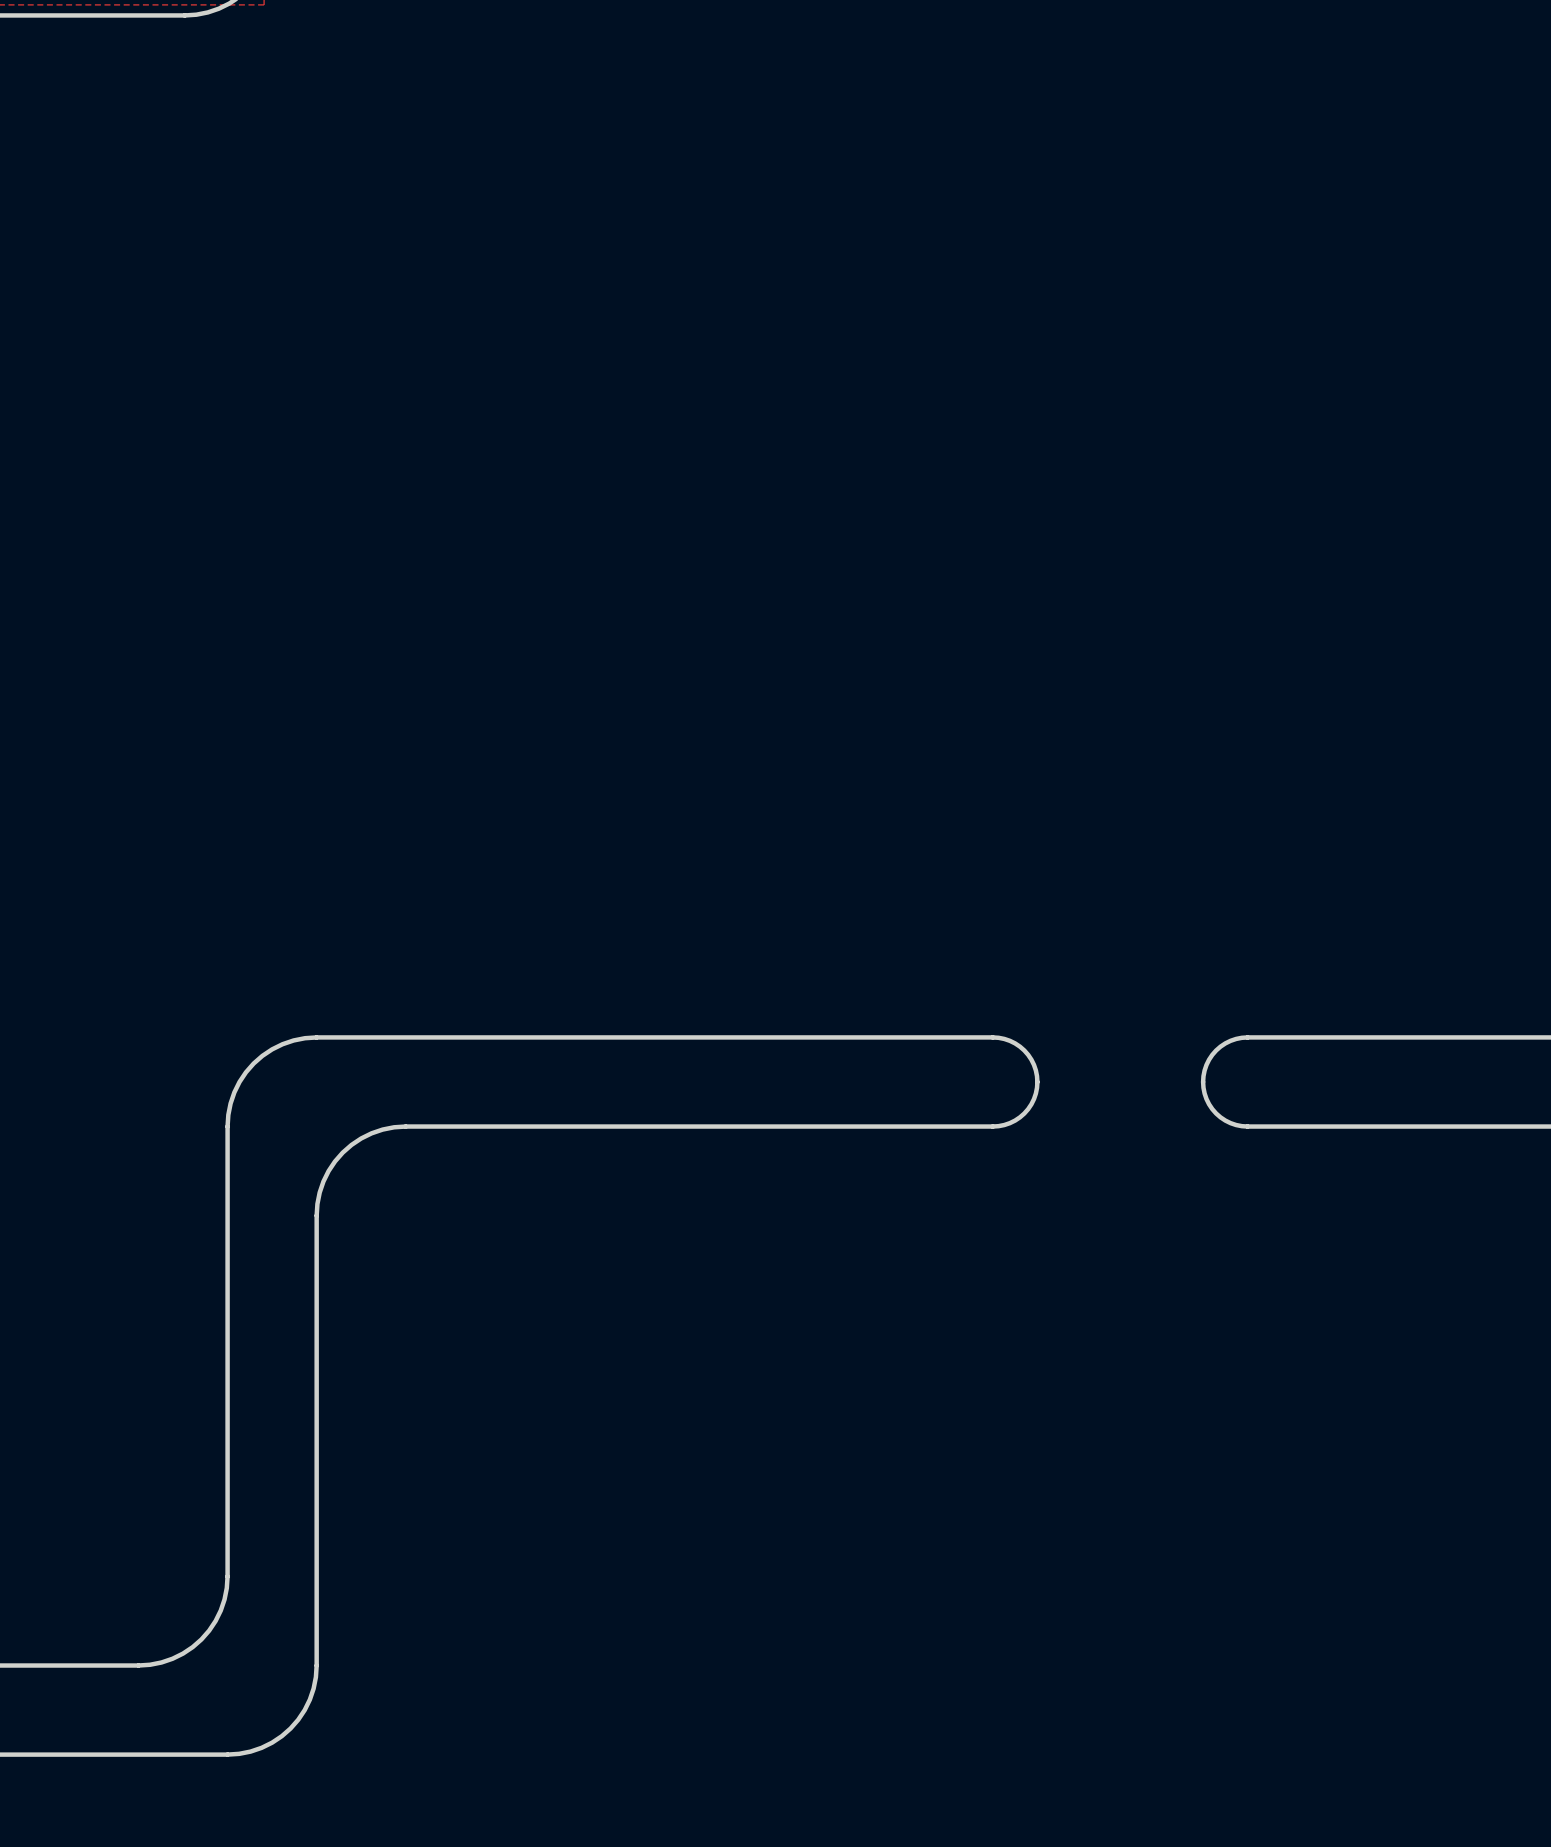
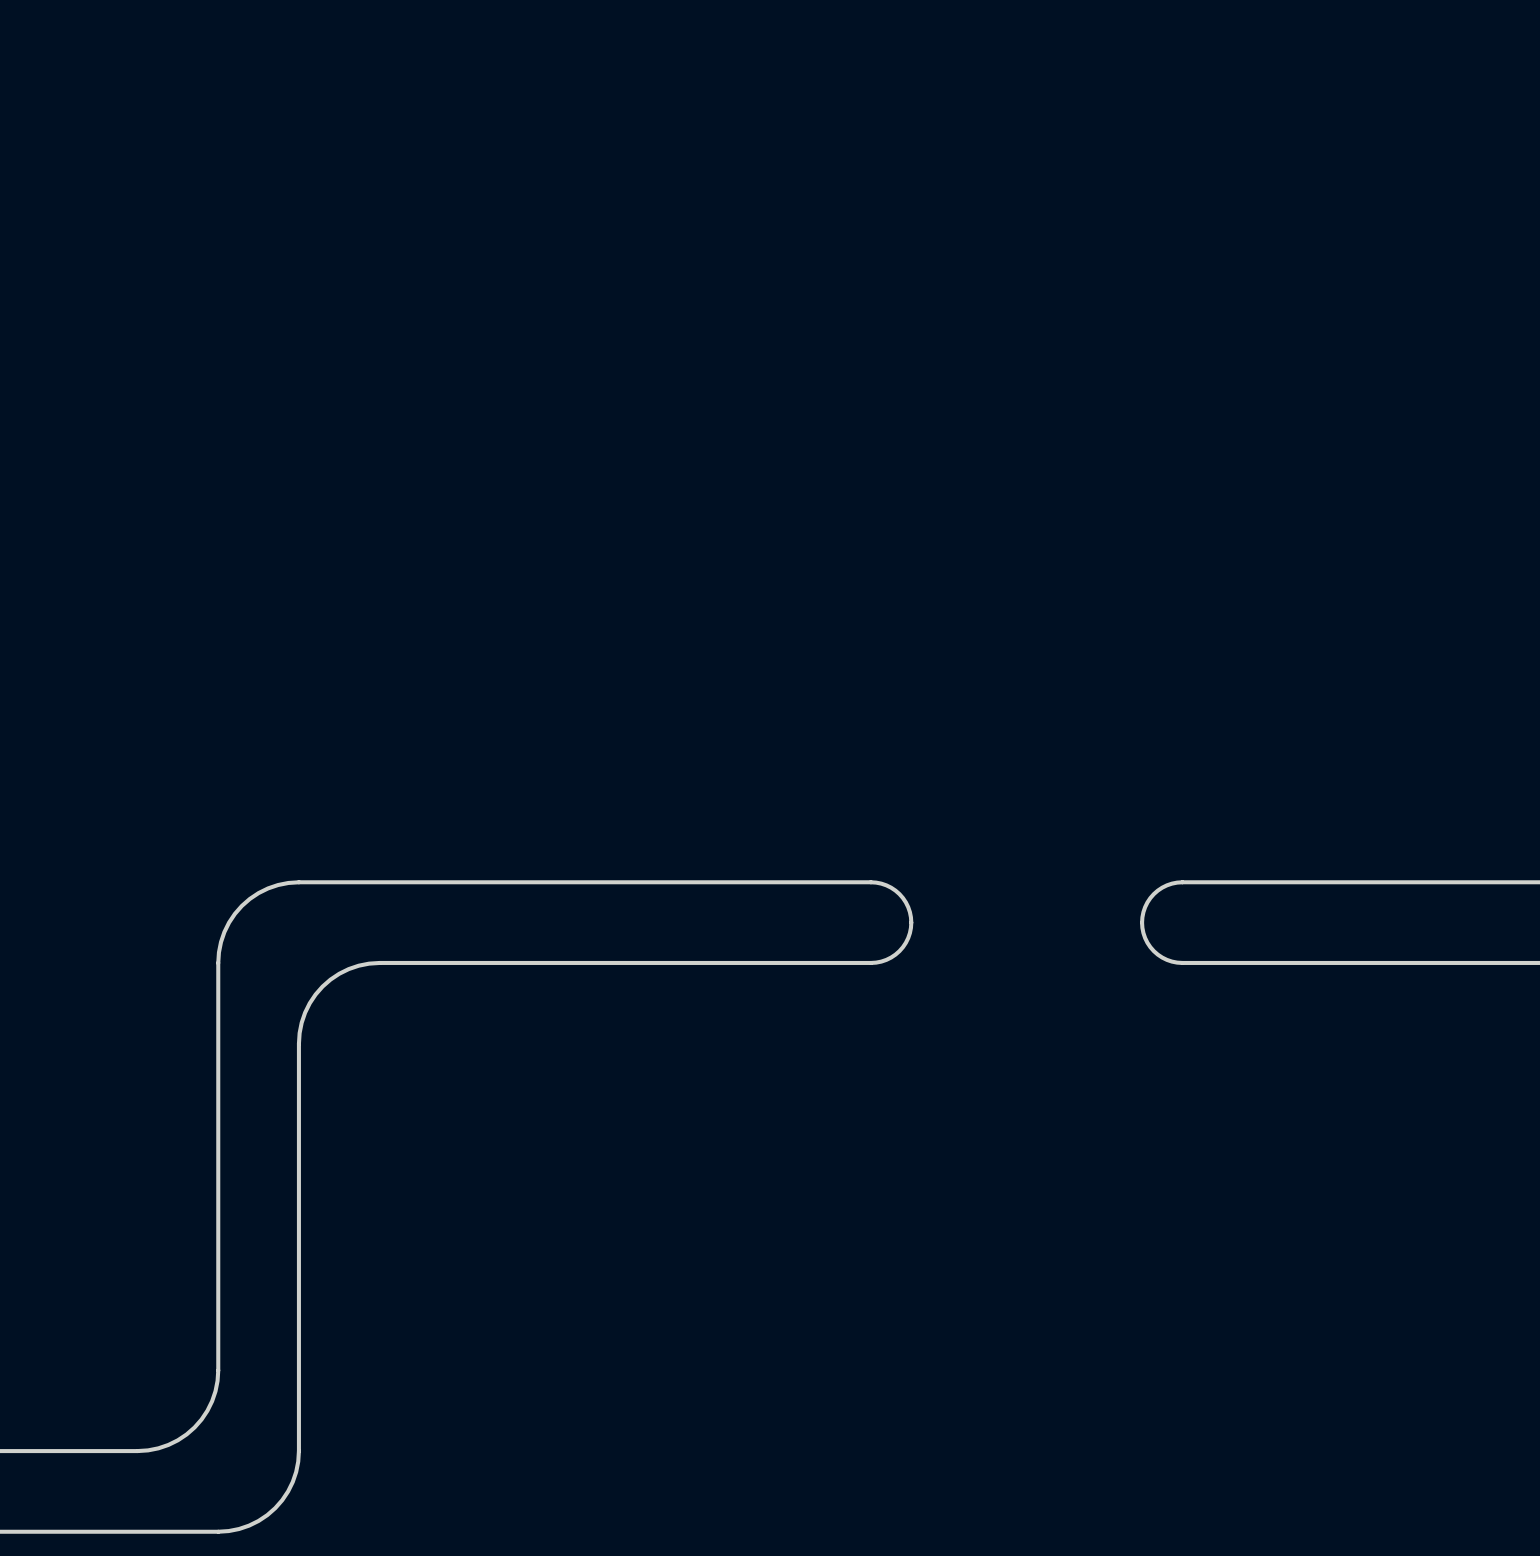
board edge: (948, 1037) (998, 1037) (1015, 1043) (1024, 1050) (1031, 1059) (1035, 1070) (1037, 1081) (1035, 1093) (1031, 1104) (1024, 1113) (1015, 1120) (998, 1126) (948, 1126) -> (870, 882) (886, 885) (899, 894) (908, 907) (911, 922) (908, 938) (899, 951) (886, 959) (870, 962)
board edge: (1292, 1037) (1241, 1037) (1225, 1043) (1216, 1050) (1209, 1059) (1204, 1070) (1203, 1081) (1204, 1093) (1209, 1104) (1216, 1113) (1225, 1120) (1241, 1126) (1292, 1126) -> (1182, 882) (1166, 885) (1153, 894) (1145, 907) (1142, 922) (1145, 938) (1153, 951) (1166, 959) (1182, 962)

